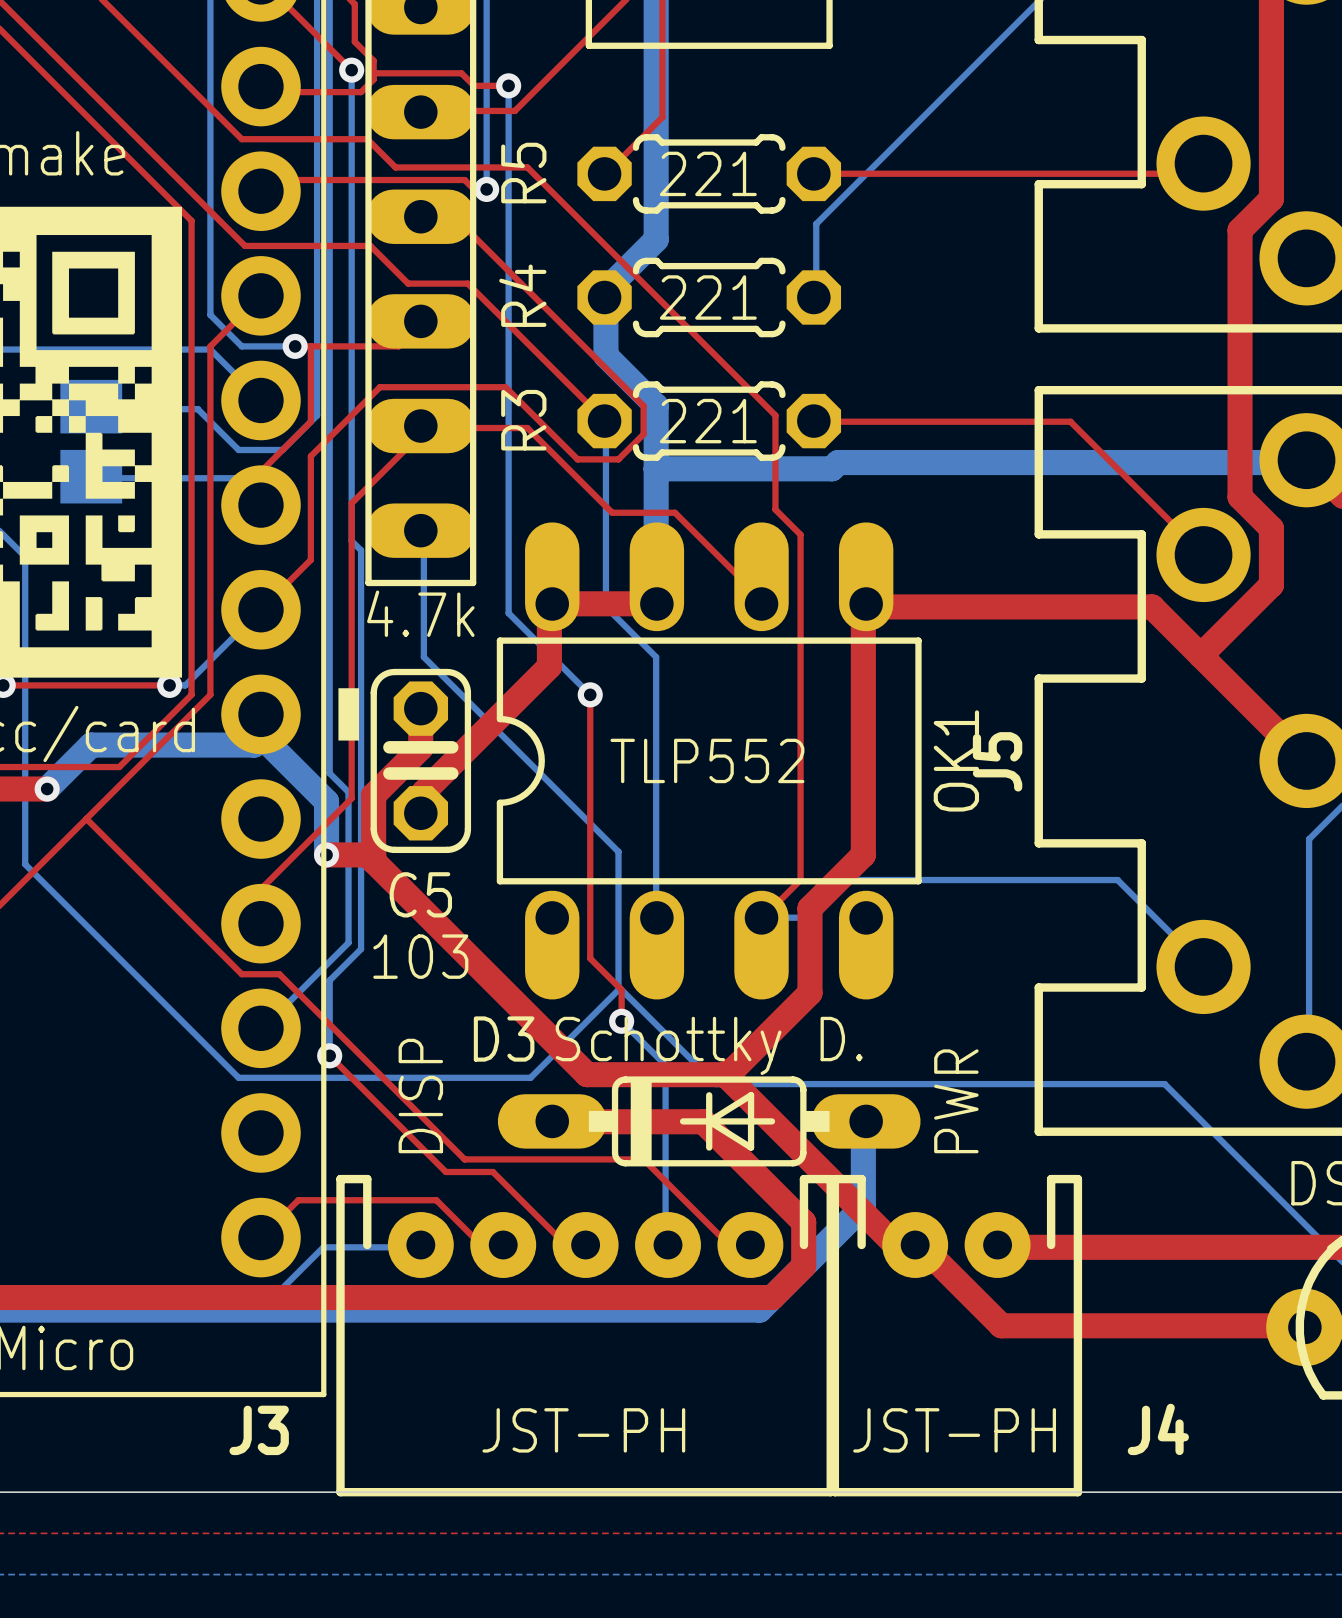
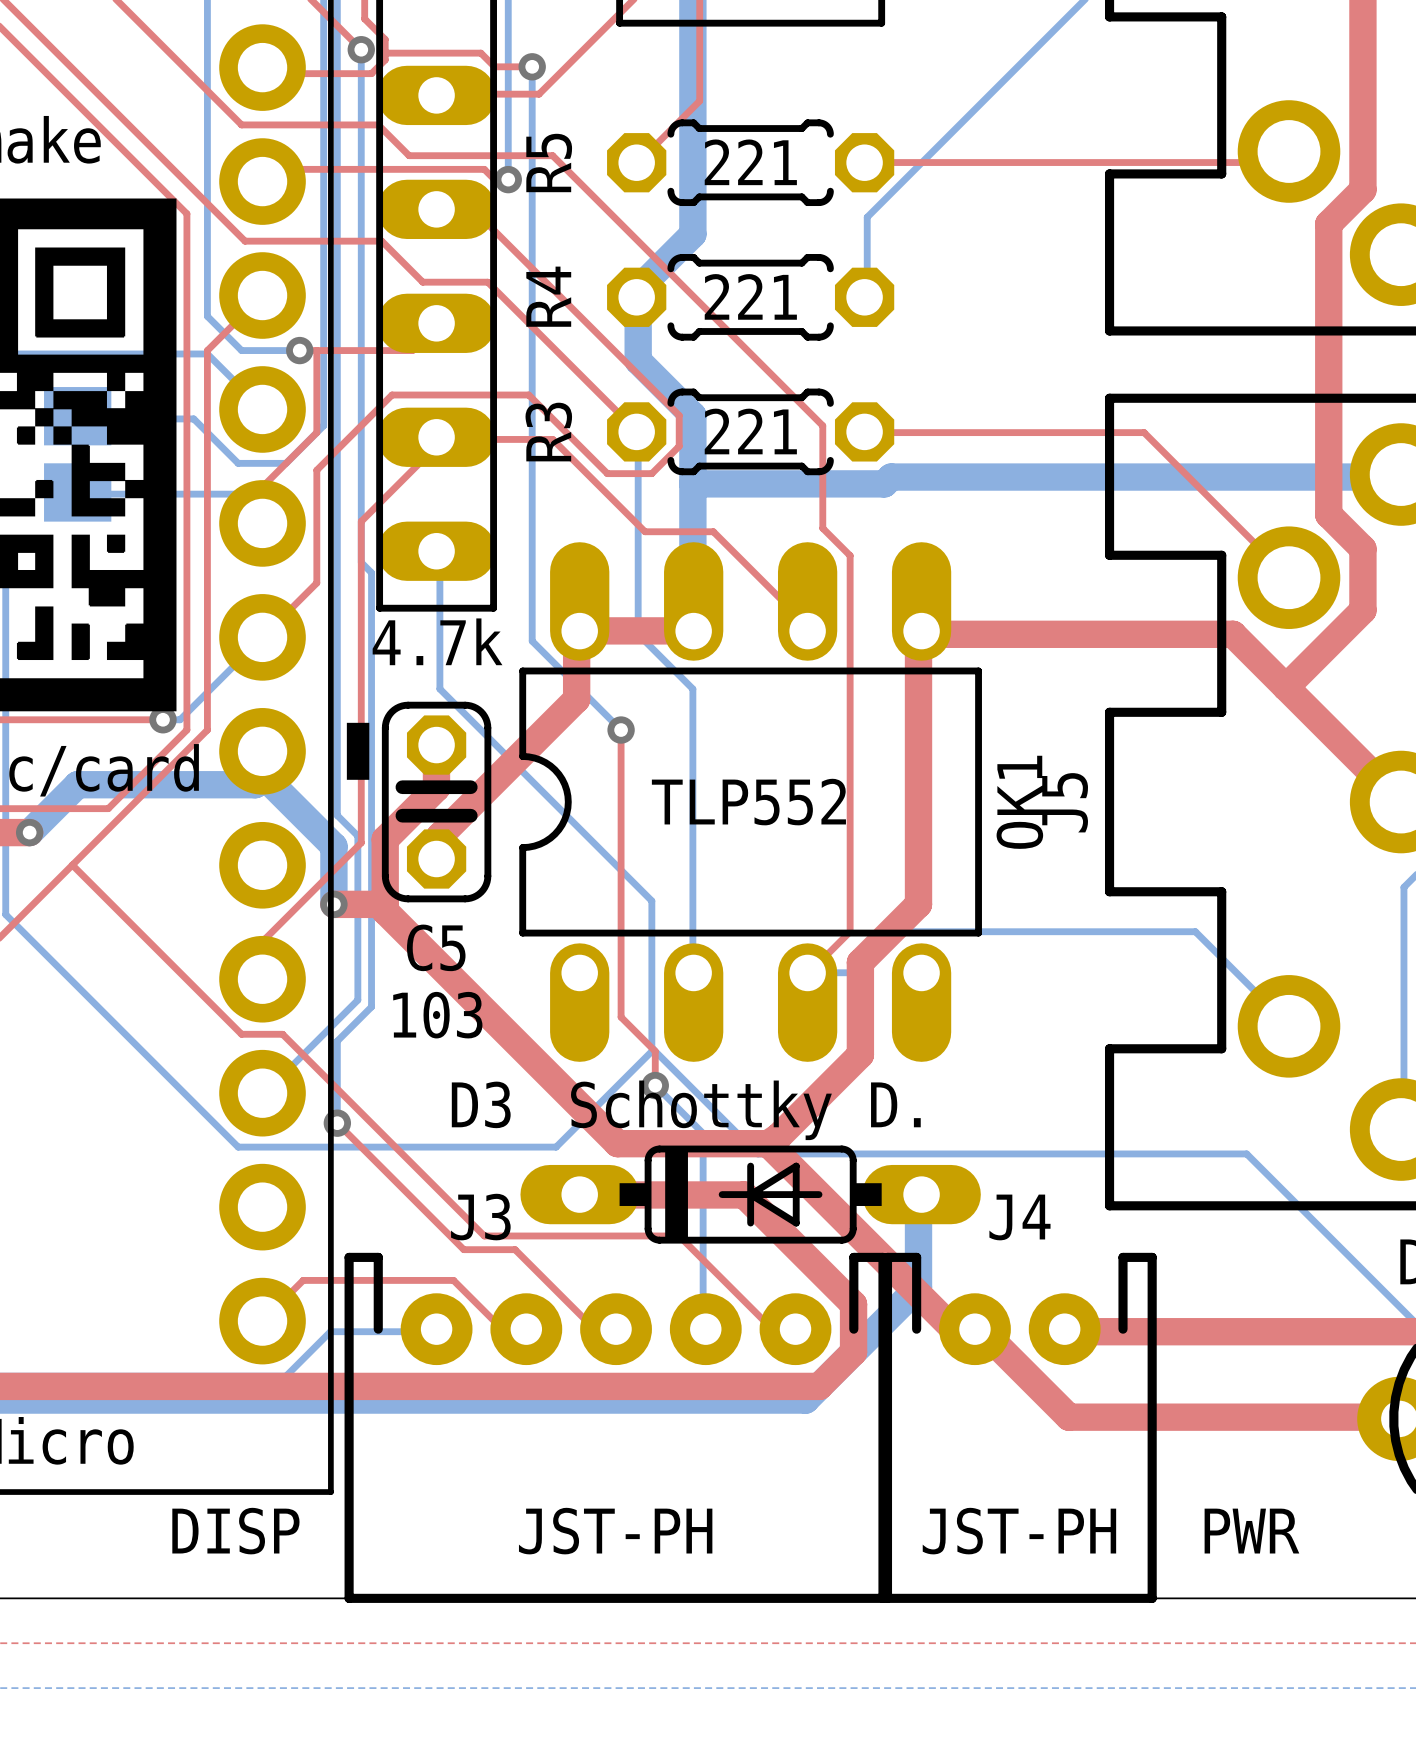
D3 name position: D3 (504, 1039) -> D3 (481, 1104)
text rotation: 0° (420, 1096) -> 90° clockwise (235, 1531)
text position: DISP (420, 1096) -> DISP (235, 1531)
text rotation: 0° (956, 1101) -> 90° clockwise (1251, 1531)
text position: PWR (956, 1101) -> PWR (1251, 1531)
J4 name position: J4 (1158, 1429) -> J4 (1019, 1217)
J3 name position: J3 (259, 1430) -> J3 (480, 1217)

